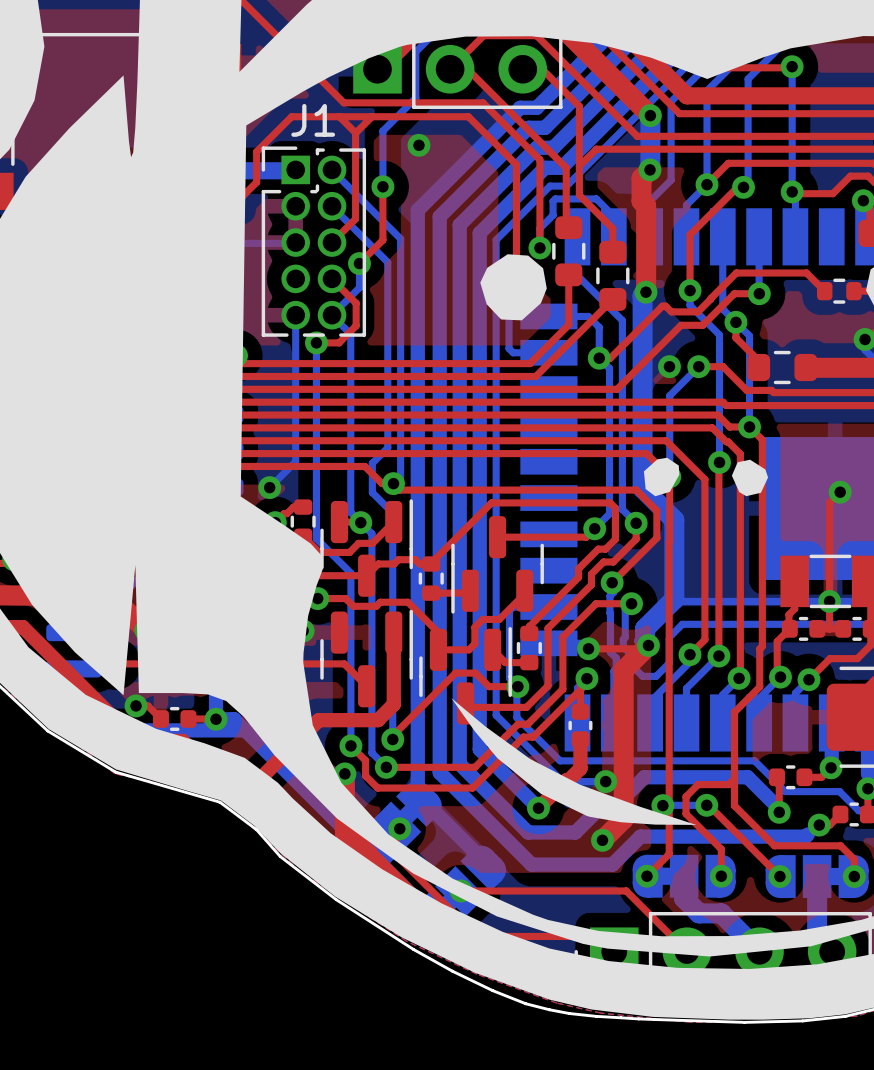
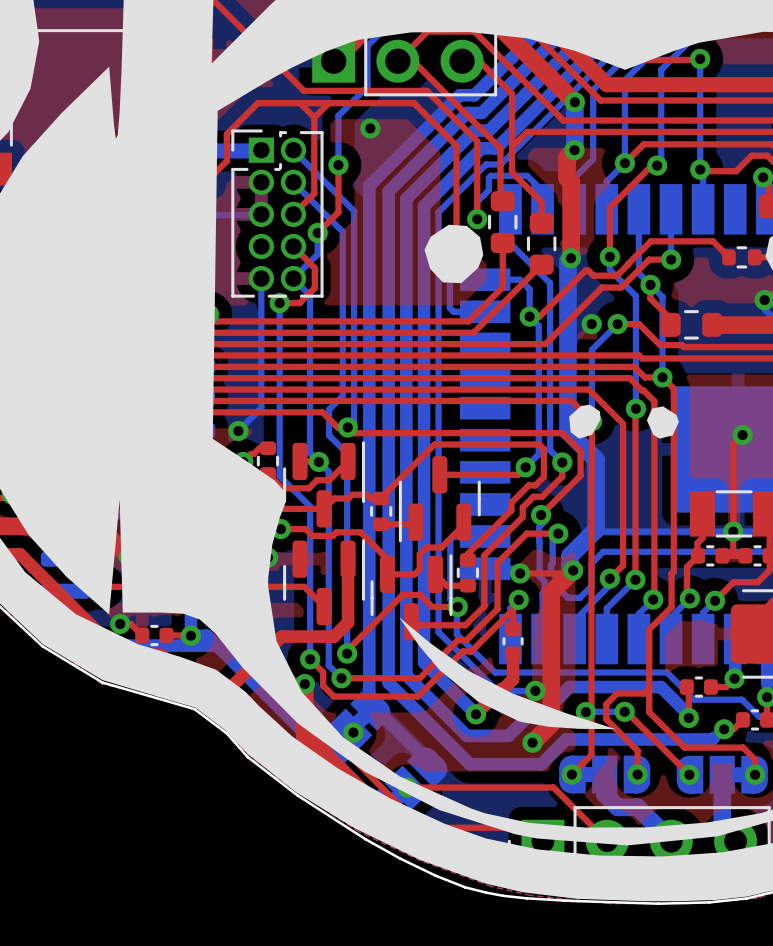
J1 name: J1 (313, 120) -> none

